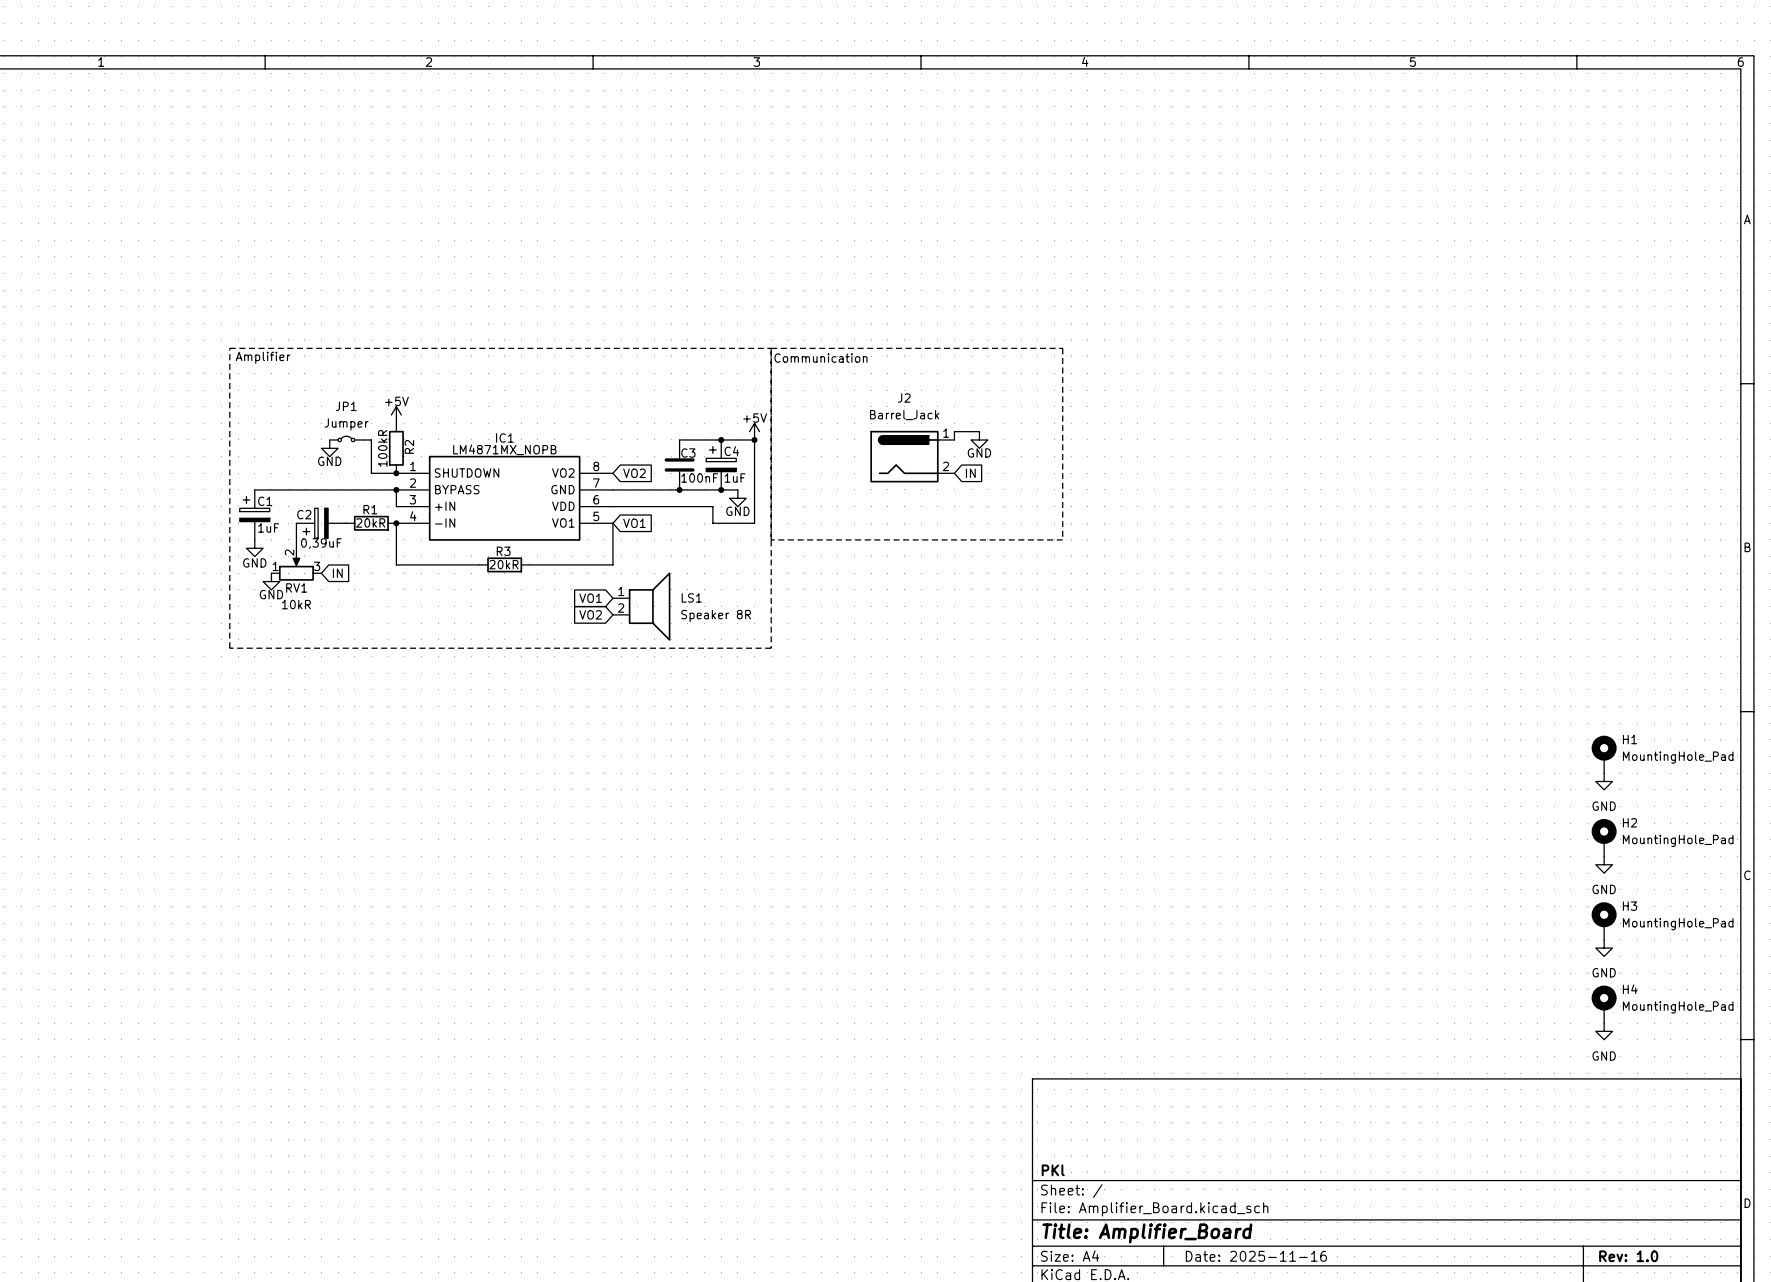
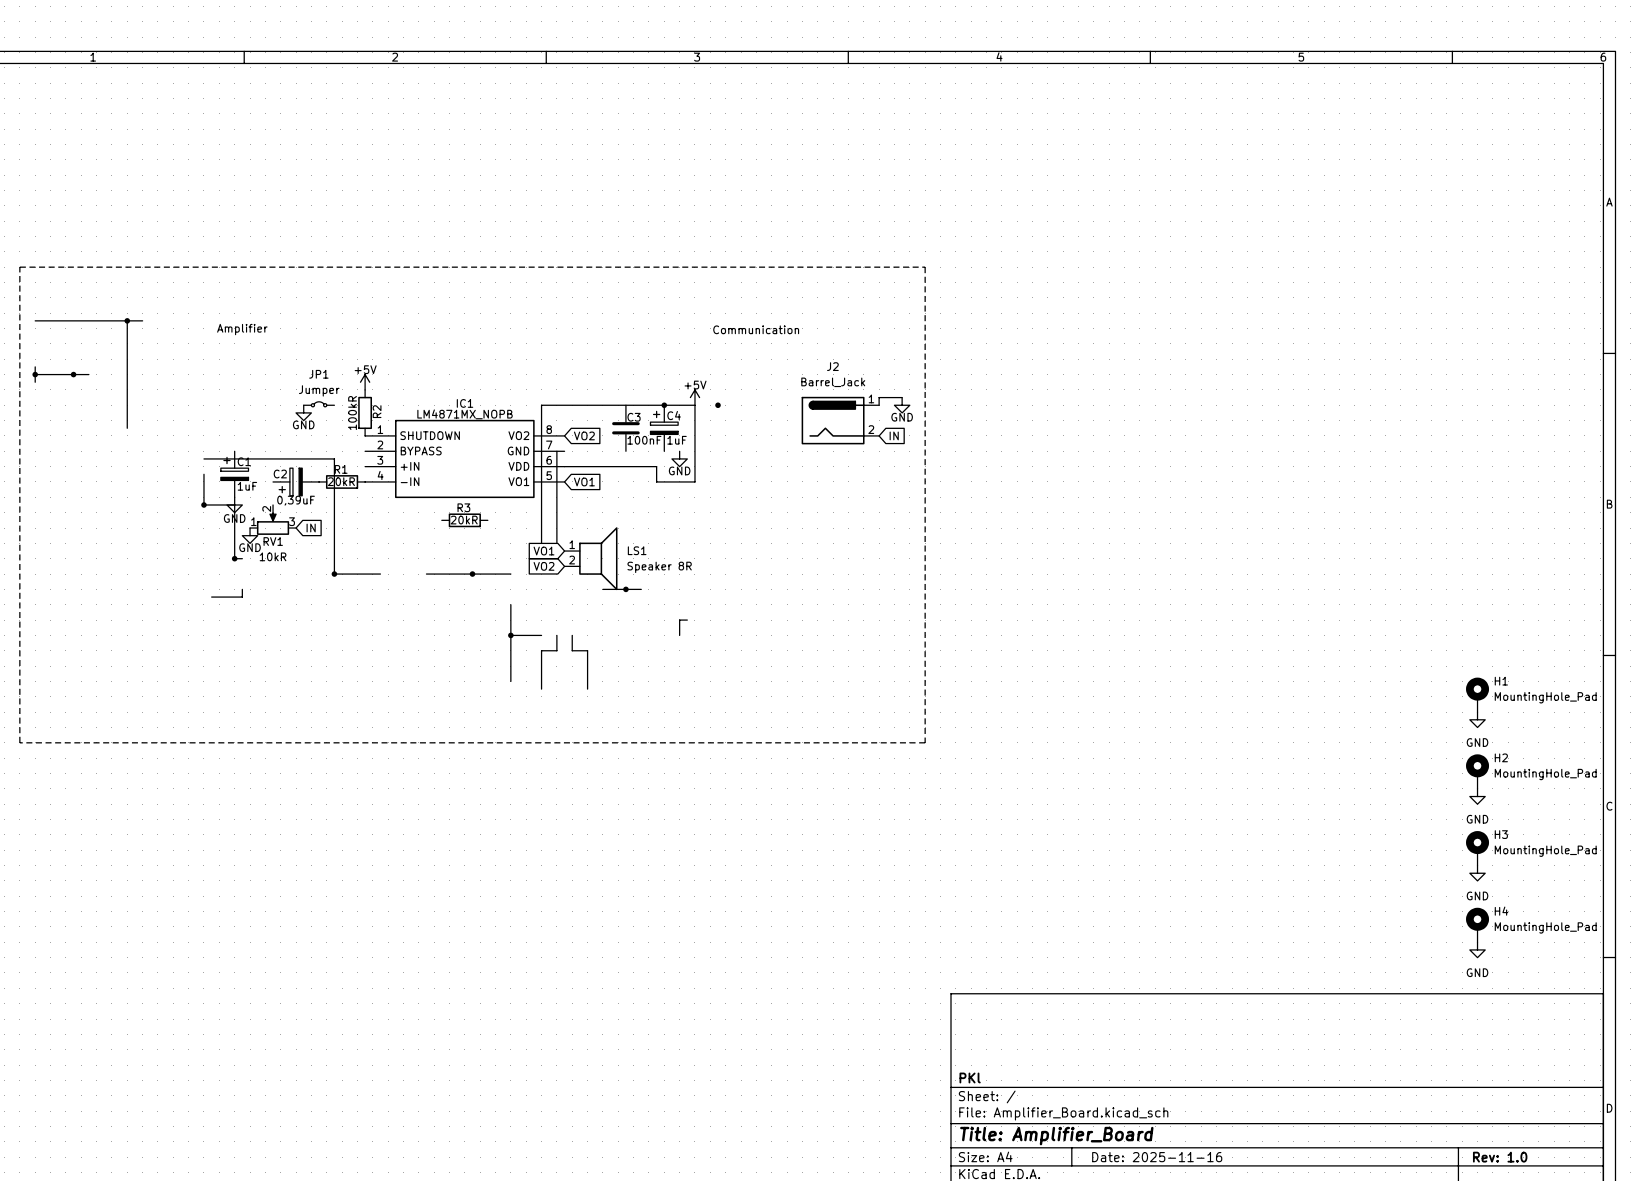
line: none -> (19, 267) (925, 267) (925, 742) (19, 742) (19, 267)
wire: none -> (35, 320) (142, 320)
wire: none -> (127, 320) (127, 428)
junction: none -> (127, 320)
line: (771, 348) (771, 648) (229, 648) (229, 348) (1062, 348) (1062, 539) (771, 539) -> none
wire: none -> (35, 366) (35, 382)
wire: none -> (35, 374) (88, 374)
junction: none -> (35, 374)
junction: none -> (73, 374)
wire: (363, 439) (371, 439) (371, 473) (396, 473) -> none
wire: none -> (625, 405) (541, 405) (541, 543)
junction position: (754, 439) -> (718, 405)
junction: (396, 473) -> none
wire: (254, 489) (396, 489) (396, 506) -> none
junction: (396, 489) -> none
wire: none -> (556, 451) (556, 543)
wire: (612, 489) (737, 489) -> none
junction: (679, 489) -> none
junction: (721, 489) -> none
wire: none -> (203, 458) (334, 458) (334, 574) (380, 574)
wire: none -> (203, 474) (203, 504) (234, 504) (234, 558) (242, 558)
wire: (296, 523) (296, 548) -> none
wire: (396, 523) (396, 564) (479, 564) -> none
junction: (396, 523) -> none
wire: (612, 523) (612, 564) (529, 564) -> none
junction: none -> (203, 504)
junction: none -> (234, 558)
junction: none -> (334, 574)
wire: none -> (426, 574) (510, 574)
junction: none -> (472, 574)
wire: none -> (242, 589) (242, 597) (211, 597)
wire: none -> (602, 589) (641, 589)
junction: none -> (625, 589)
wire: none -> (510, 604) (510, 681)
wire: none -> (687, 620) (679, 620) (679, 635)
wire: none -> (510, 635) (541, 635)
junction: none -> (510, 635)
wire: none -> (556, 635) (556, 650) (541, 650) (541, 689)
wire: none -> (572, 635) (572, 650) (587, 650) (587, 689)

